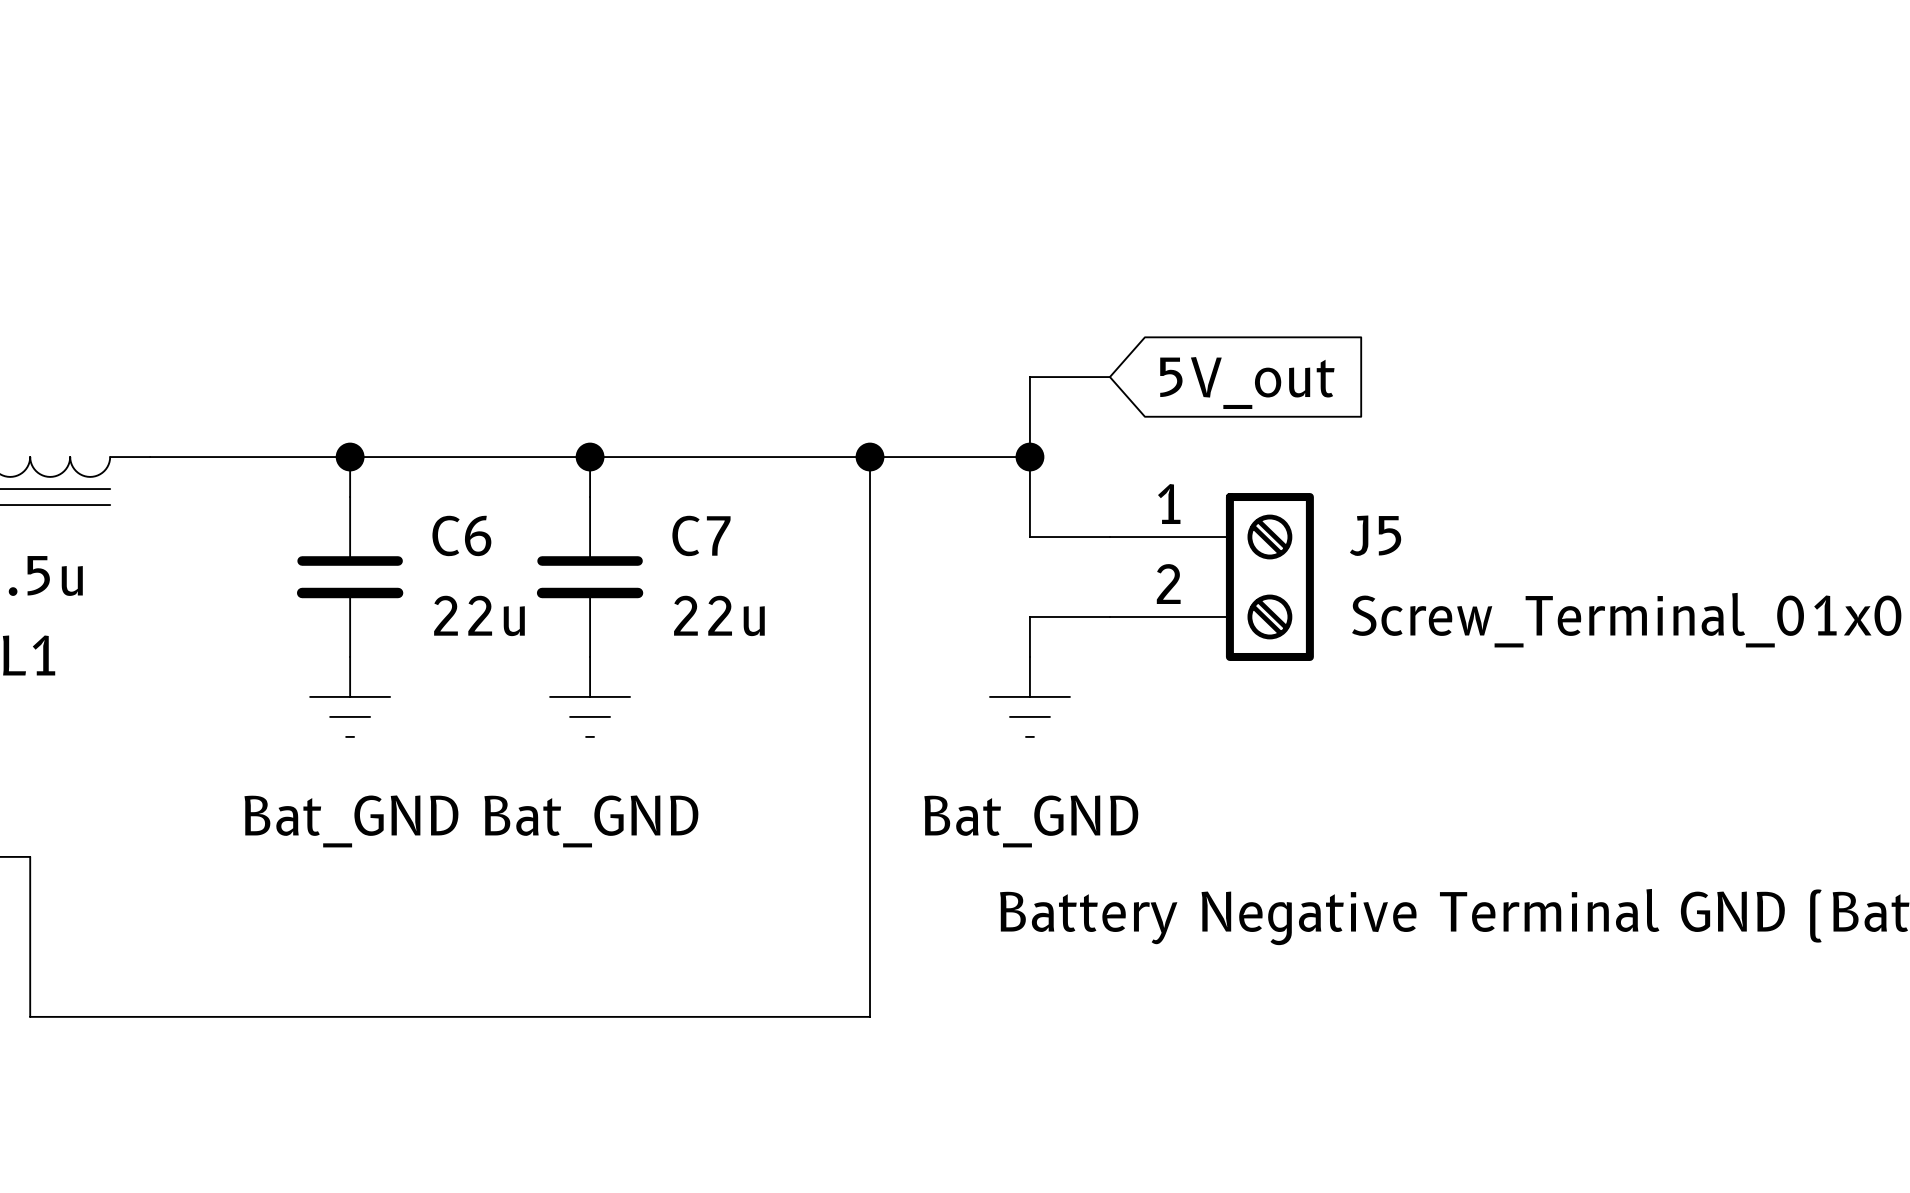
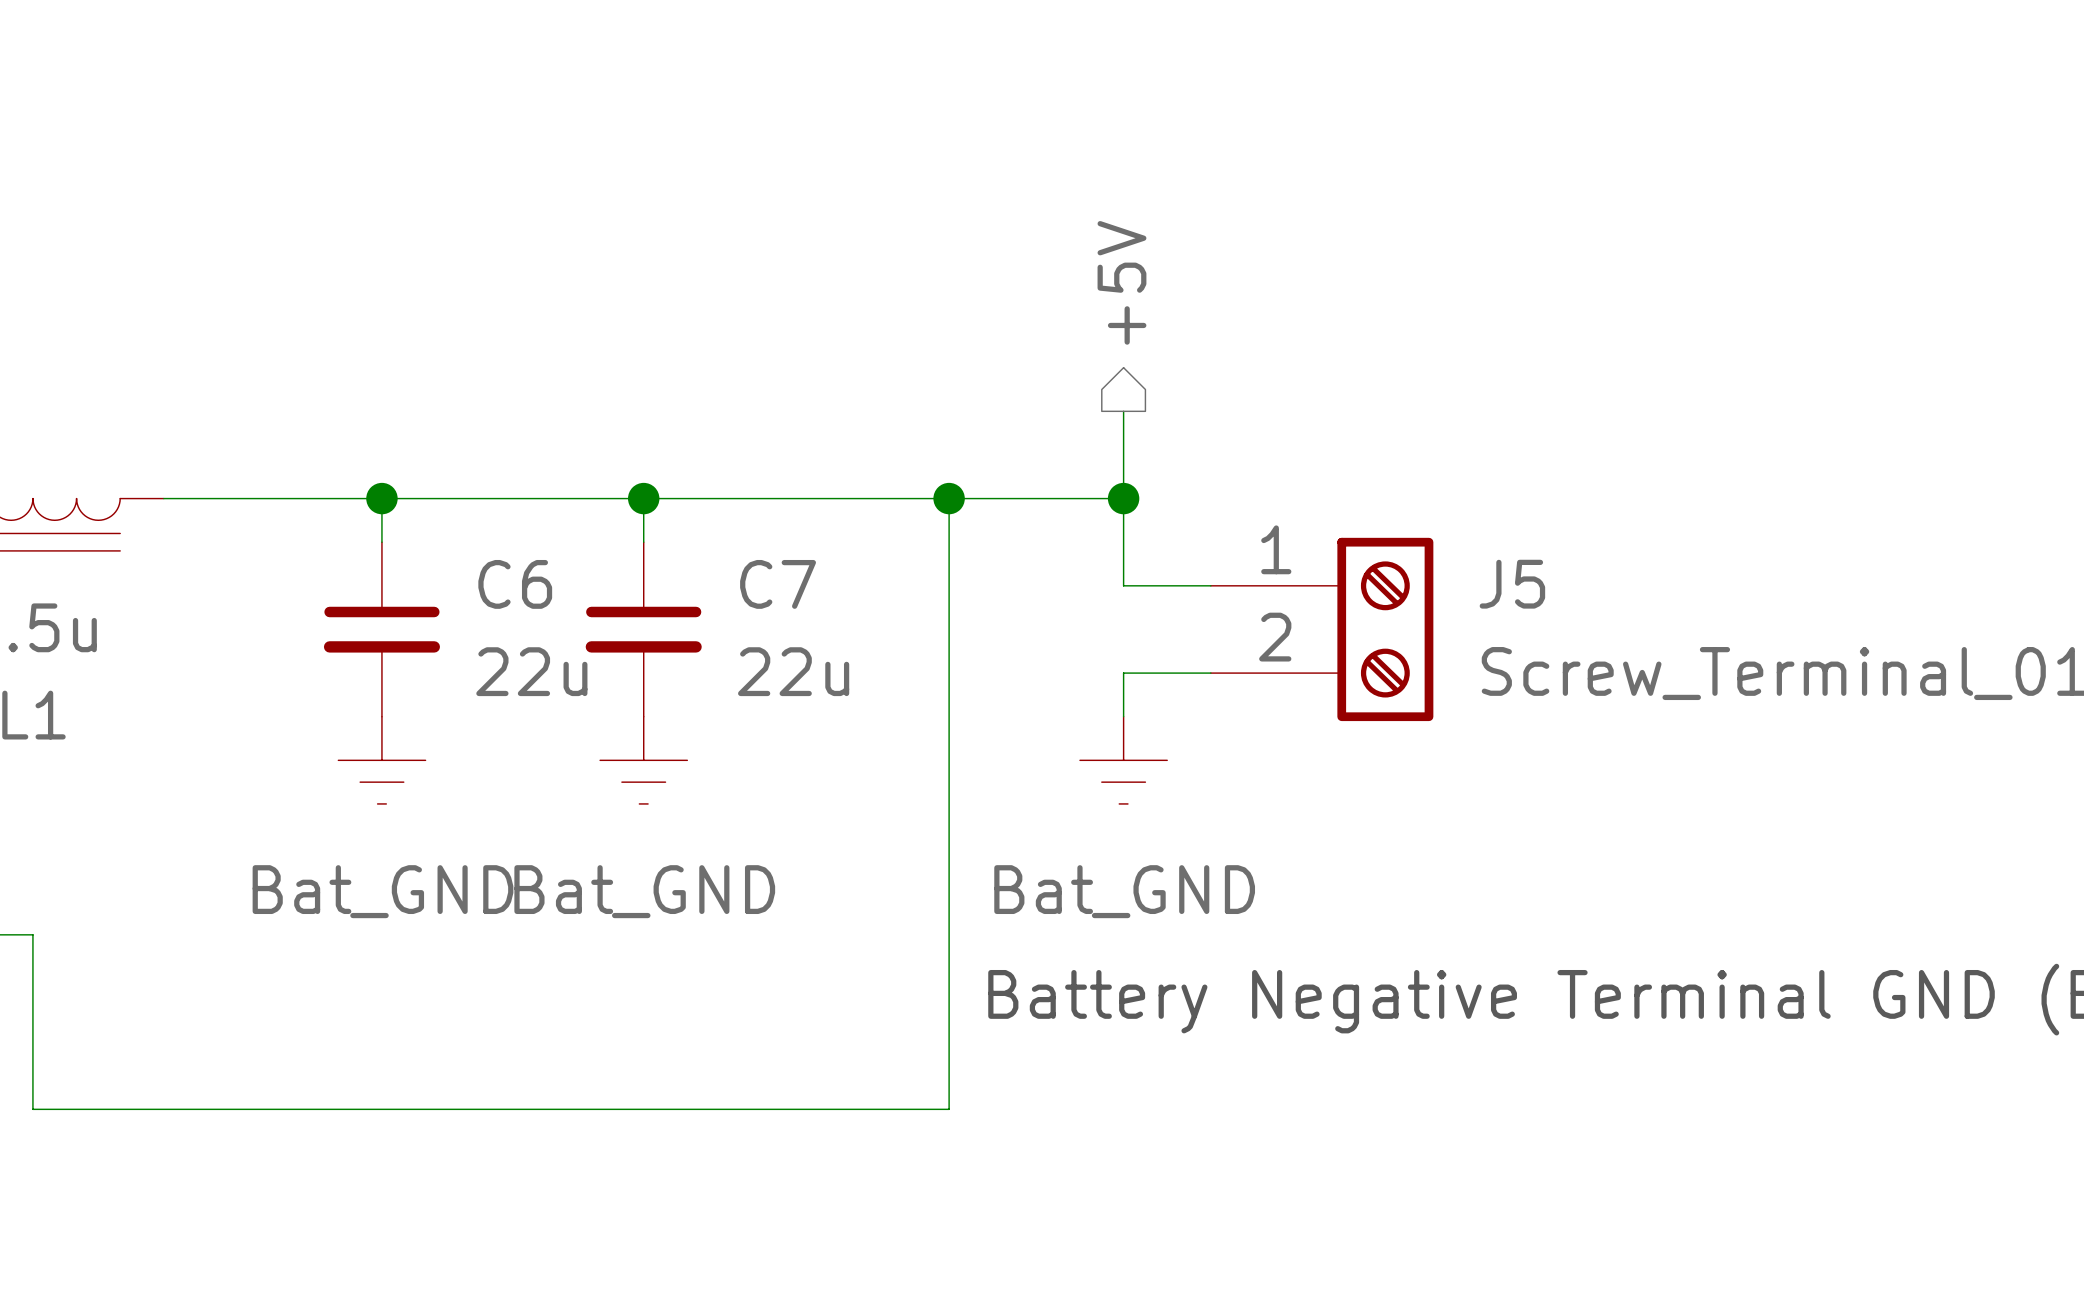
hierarchical label: none -> +5V (1121, 282)
wire: (1029, 377) (1109, 377) -> none
global label: 5V_out (1247, 383) -> none

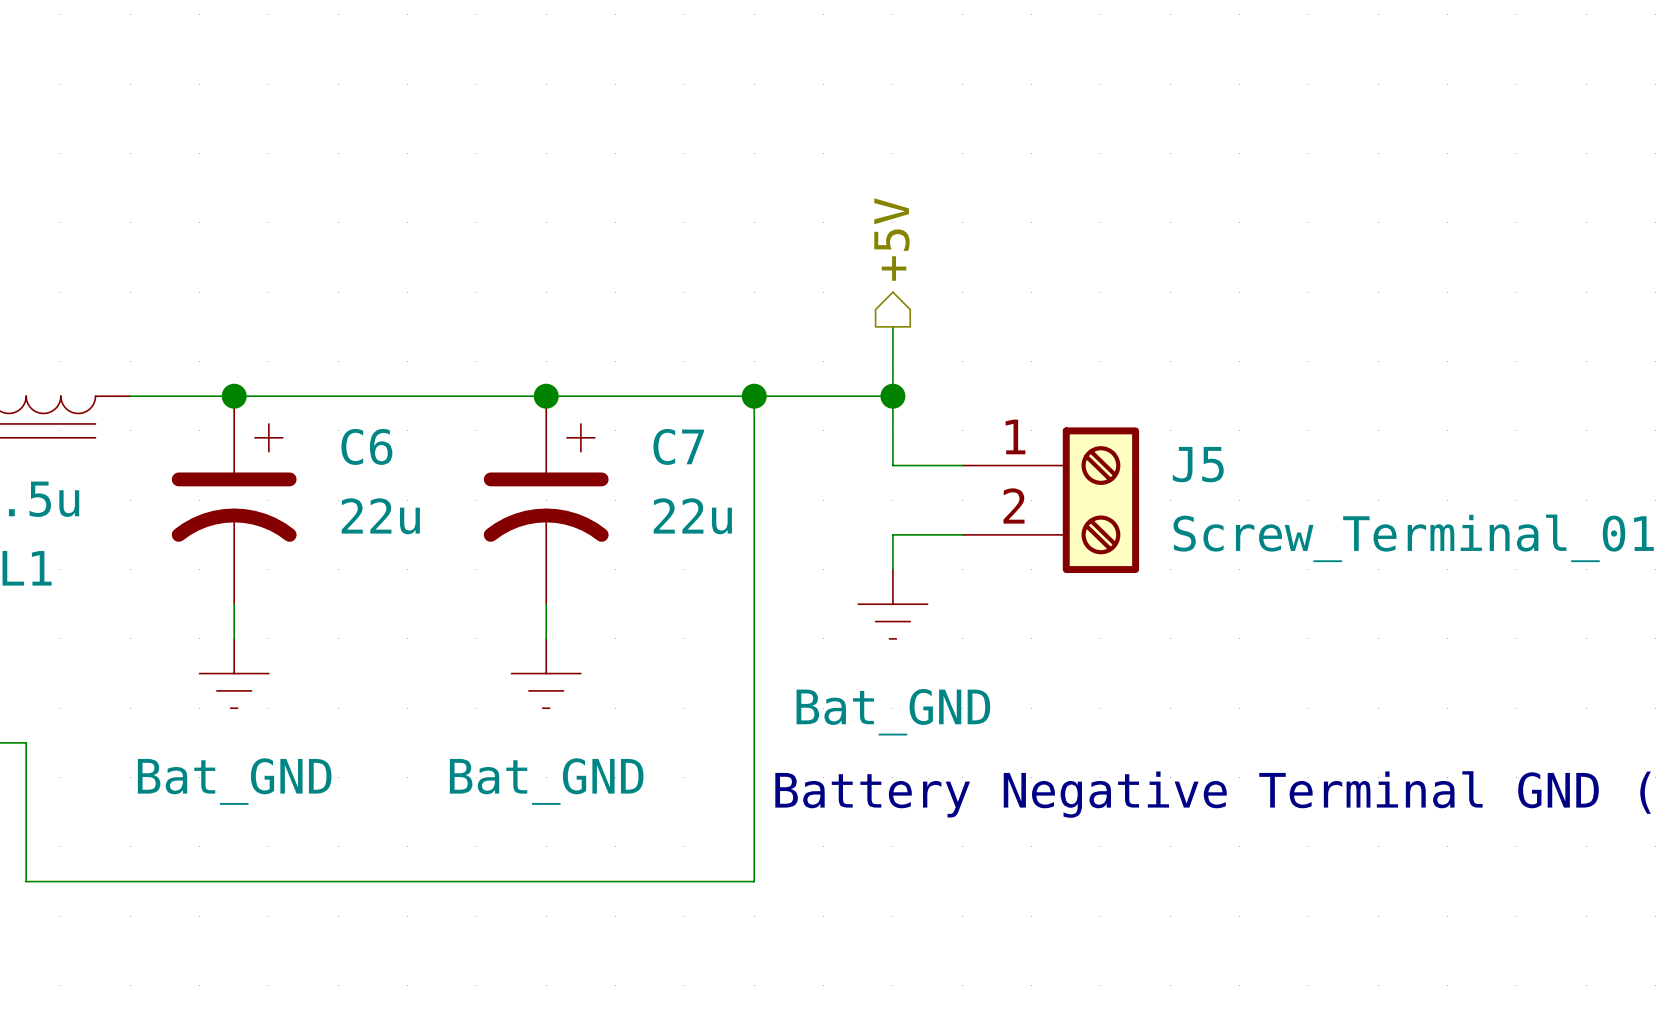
wire: (381, 498) (381, 542) -> (234, 604) (234, 638)
junction position: (381, 498) -> (234, 396)
wire: (643, 498) (643, 542) -> (546, 604) (546, 638)
junction position: (643, 498) -> (546, 396)
C6 symbol: [323, 542, 440, 717] -> [171, 396, 297, 605]
C7 symbol: [585, 542, 702, 717] -> [483, 396, 609, 605]
power symbol position: Bat_GND (381, 760) -> Bat_GND (234, 673)
power symbol position: Bat_GND (643, 760) -> Bat_GND (546, 673)

